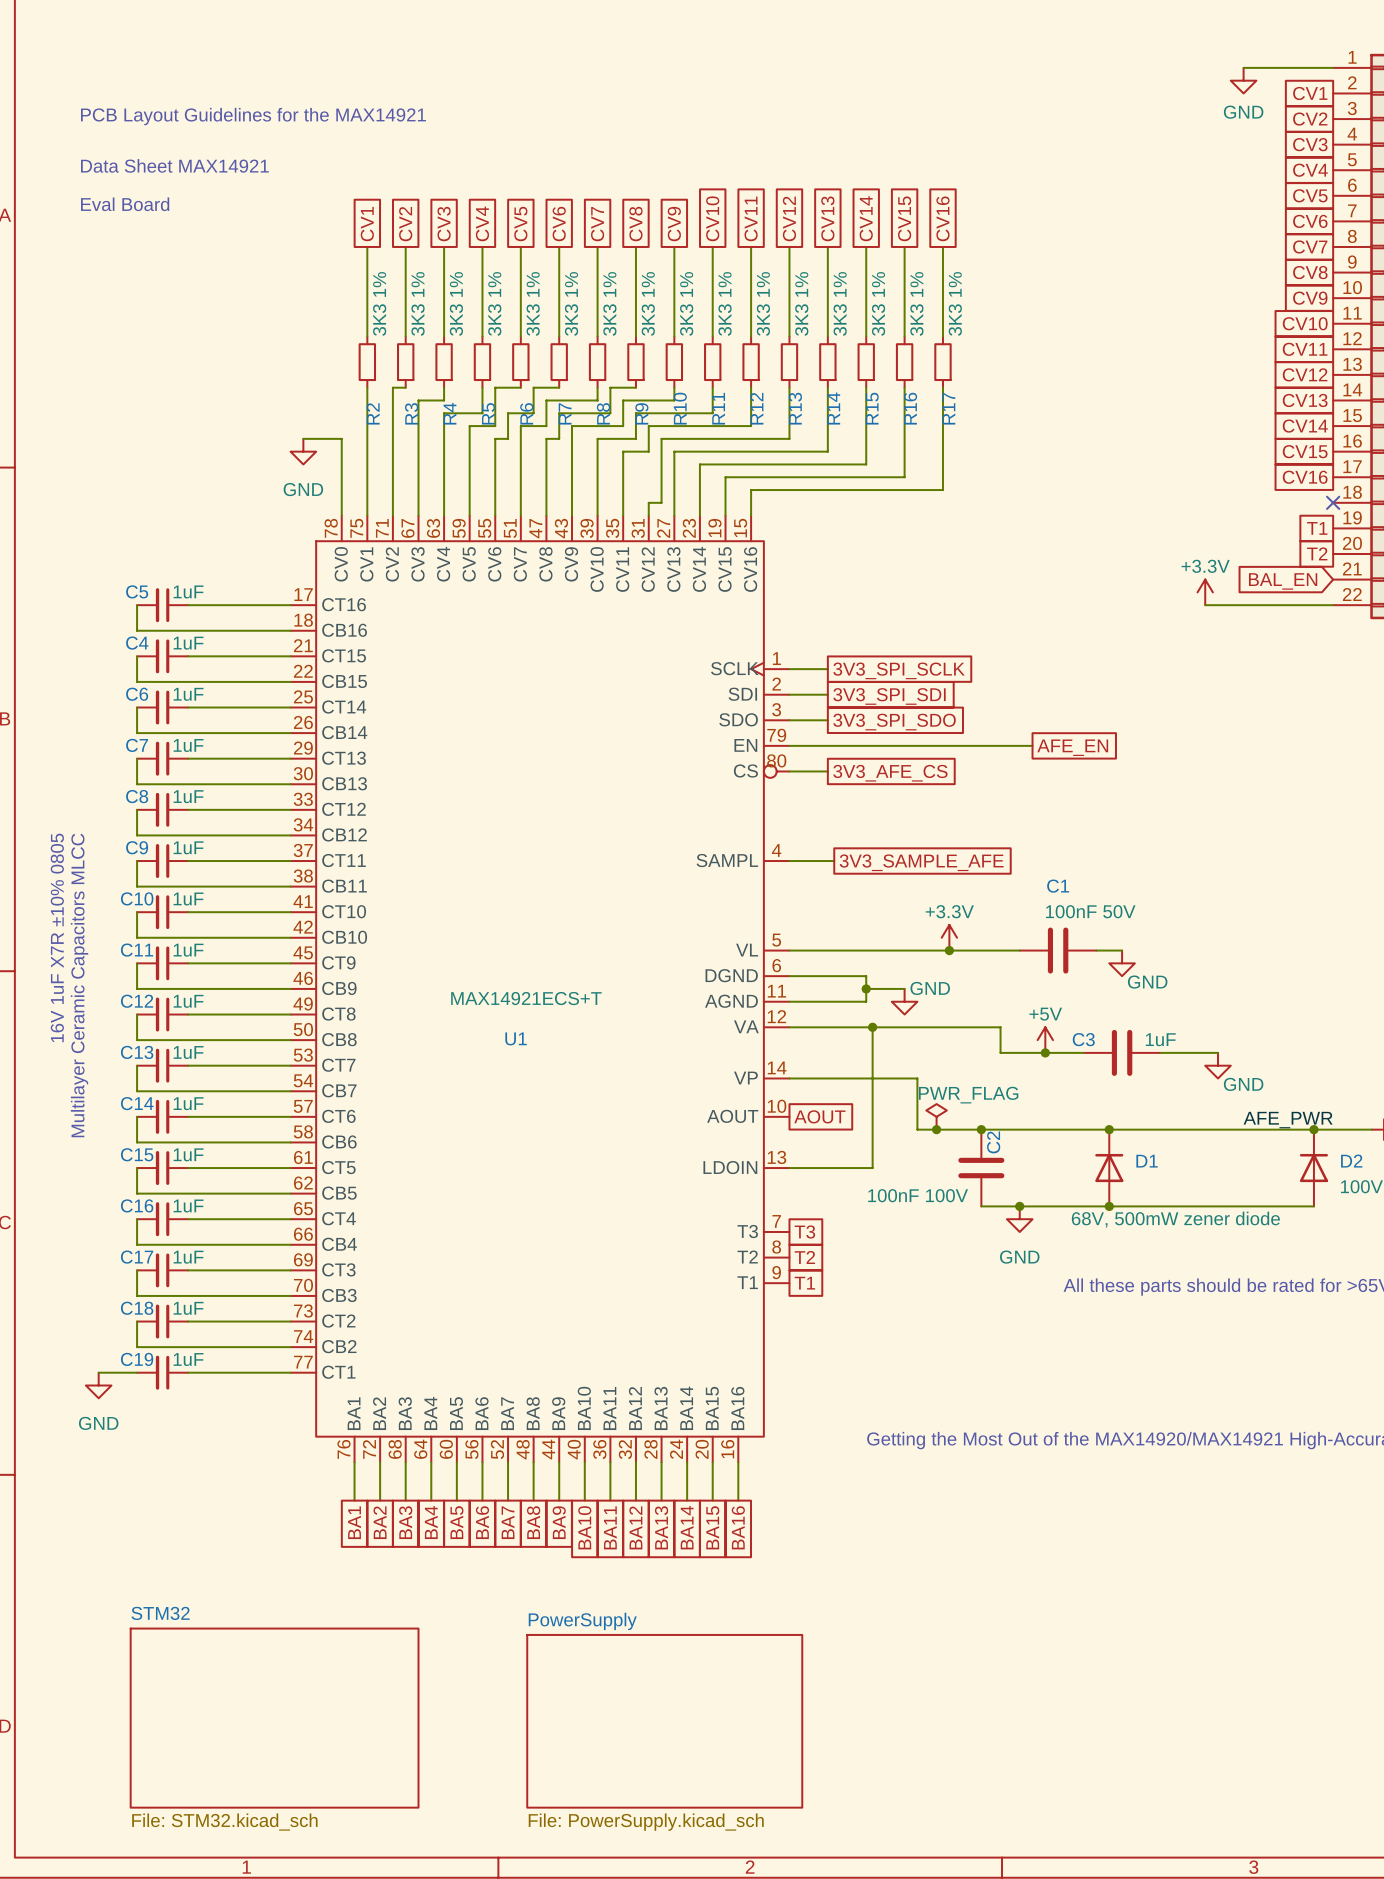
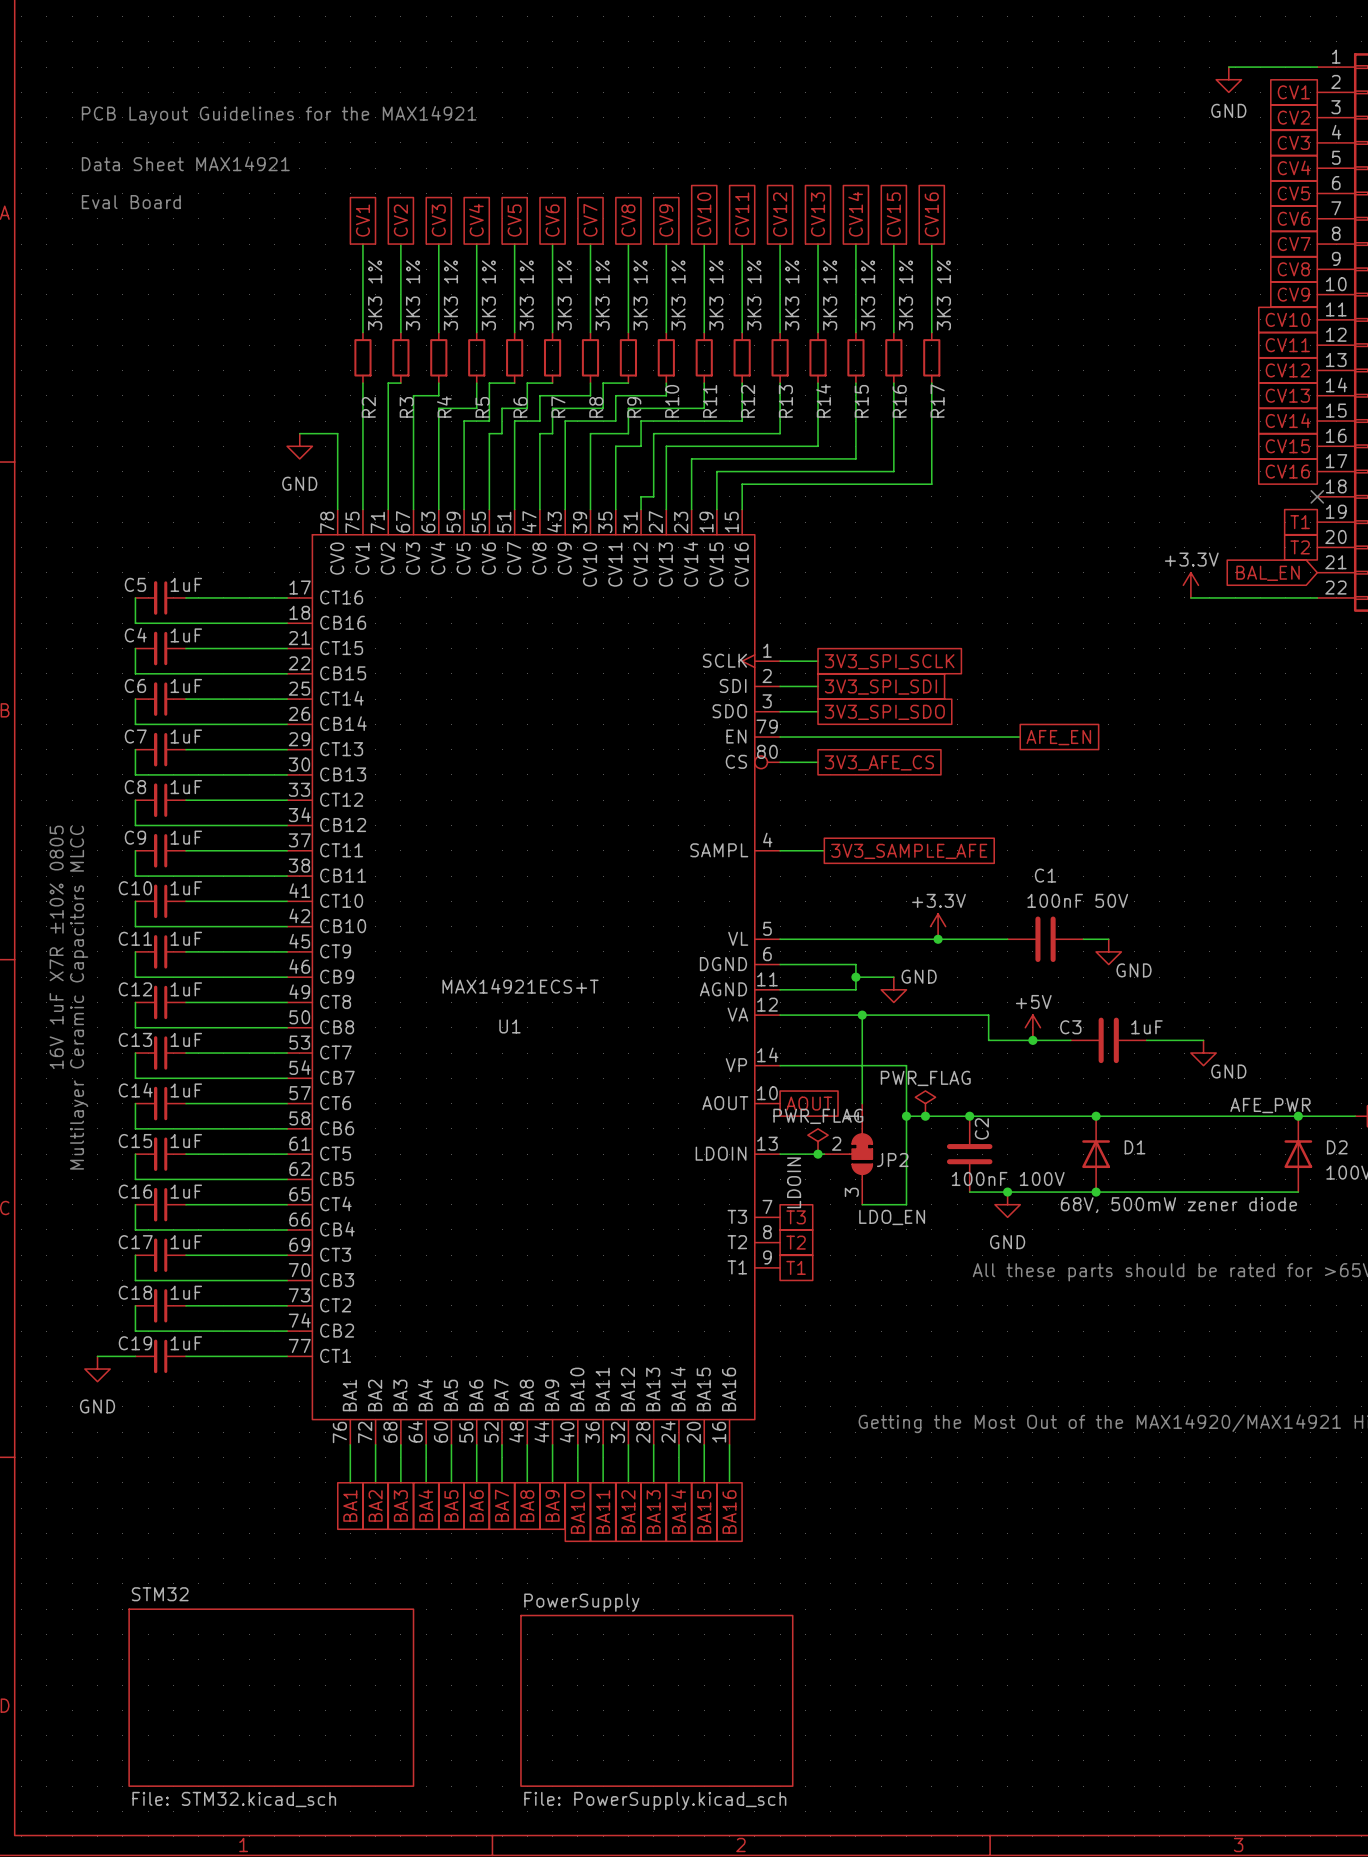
power symbol text position: PWR_FLAG (968, 1095) -> PWR_FLAG (925, 1078)
wire: none -> (906, 1116) (906, 1204) (862, 1204)
junction: none -> (906, 1116)
power symbol: none -> PWR_FLAG (818, 1141)
junction: none -> (818, 1154)
JP2: none -> LDO_EN (848, 1154)
C2 value position: 100nF 100V (918, 1195) -> 100nF 100V (1008, 1178)
label: none -> LDOIN (794, 1182)

